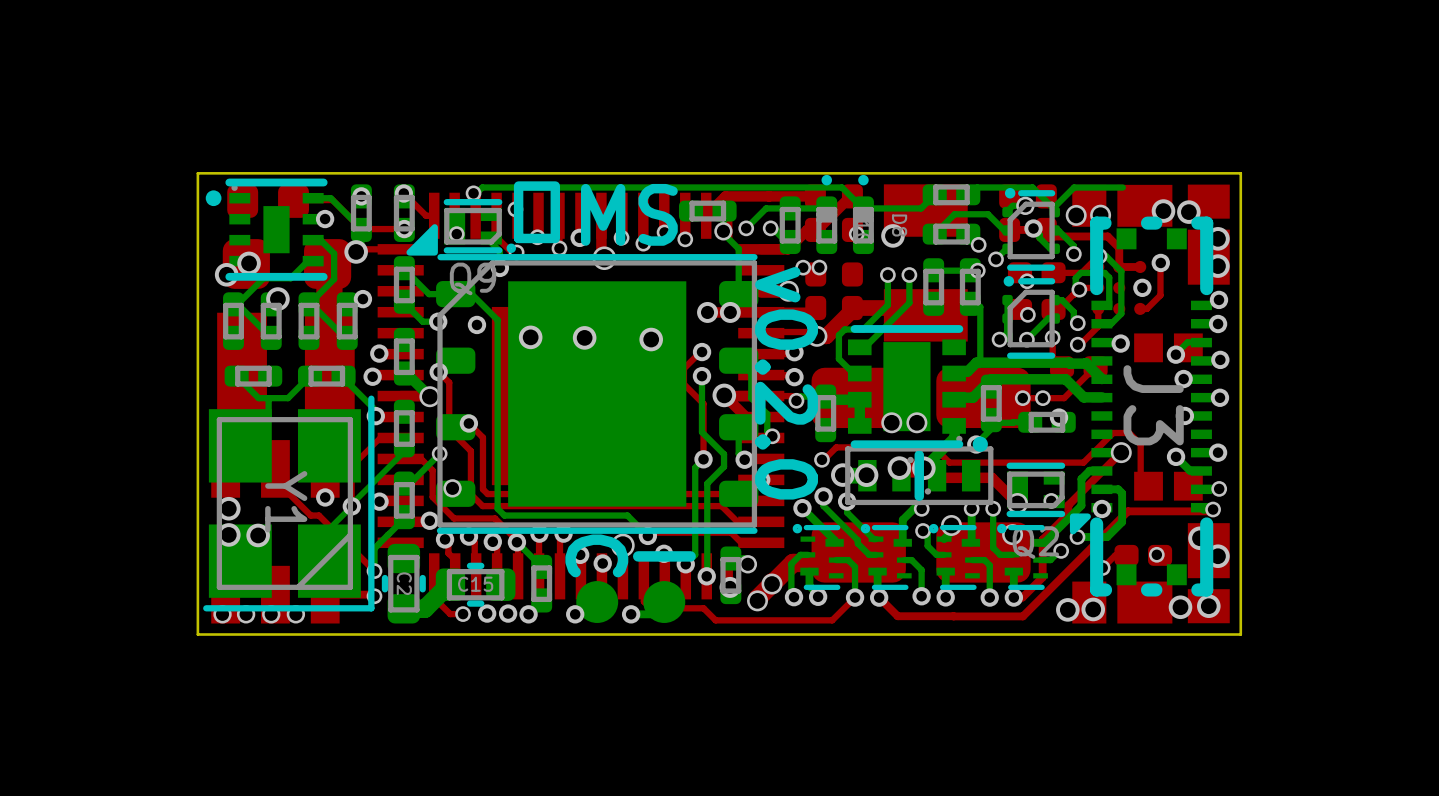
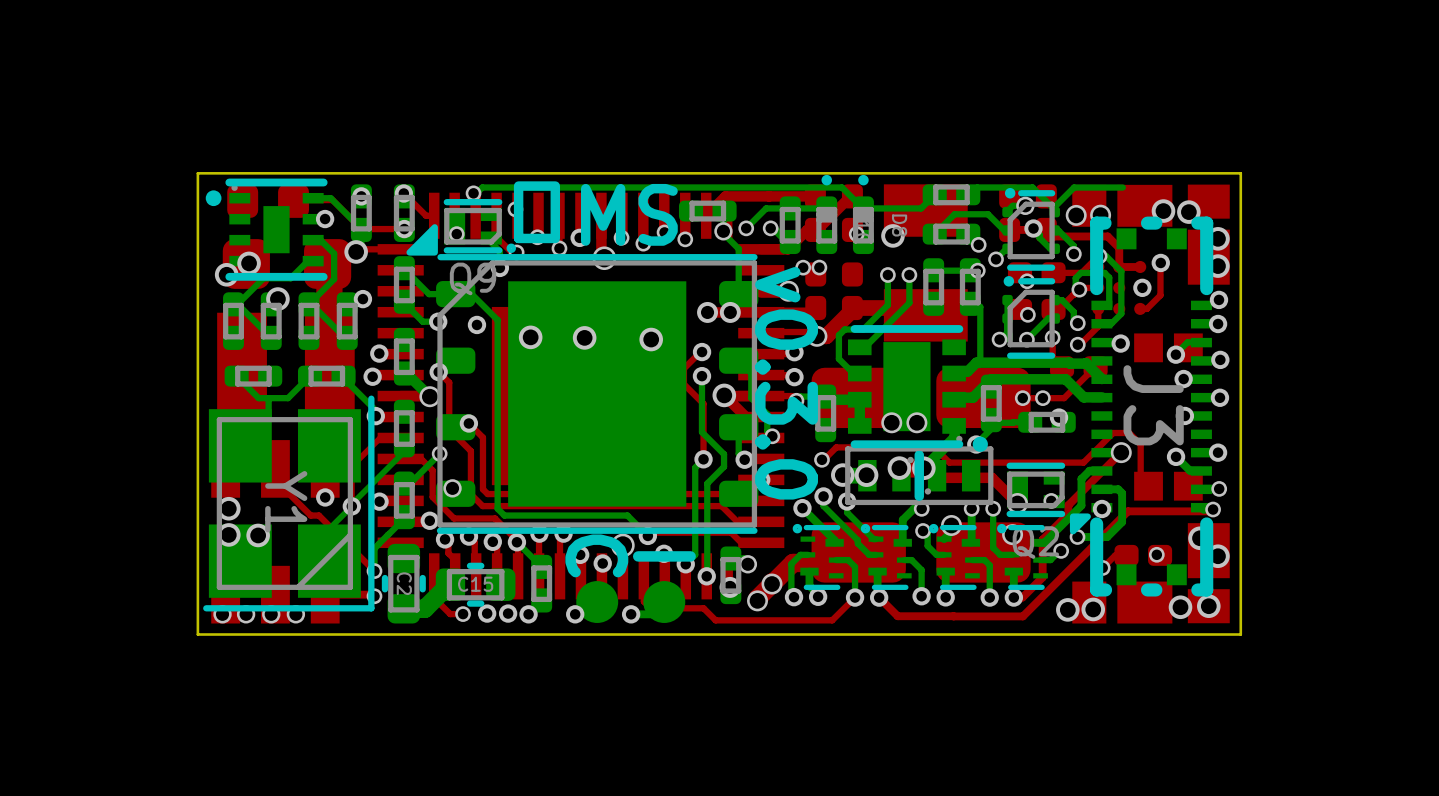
text: v0.2.0 (786, 383) -> v0.3.0 (786, 383)

